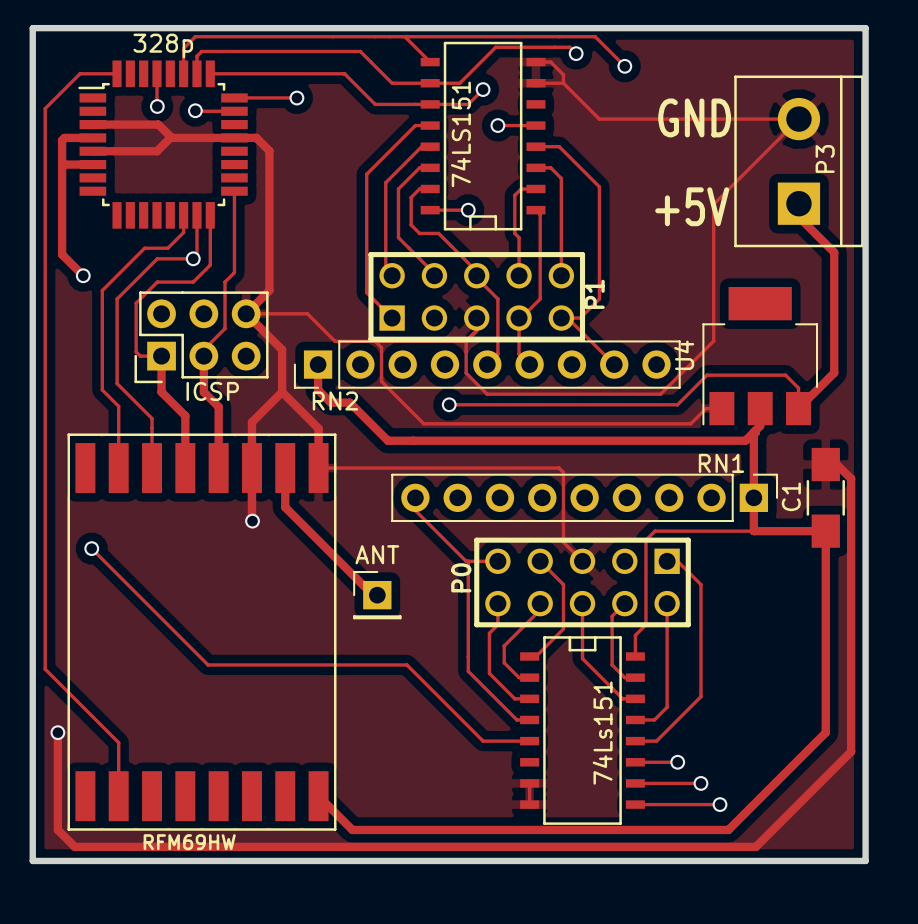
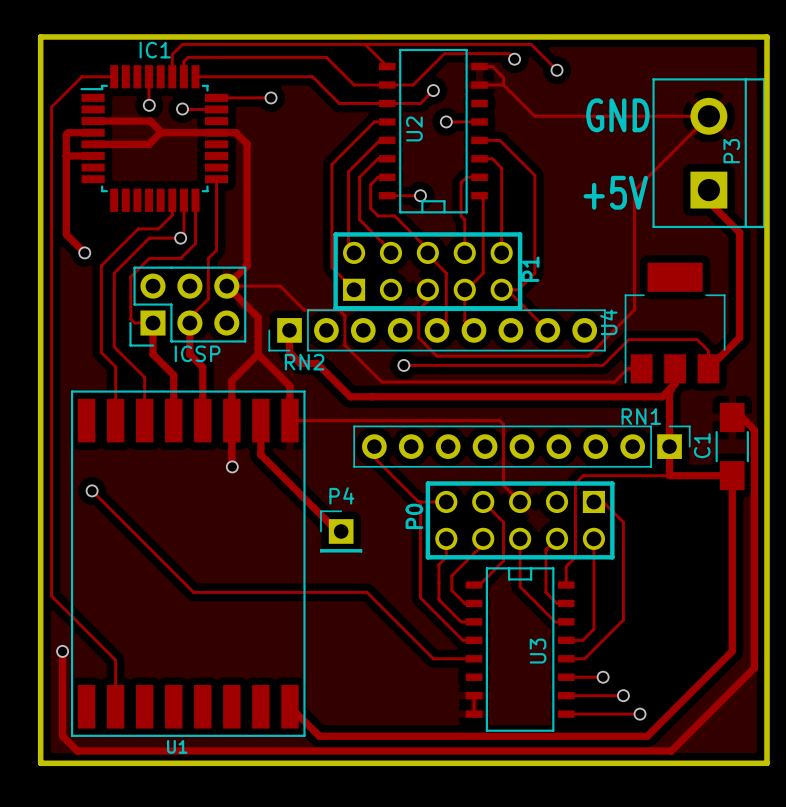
328p name: 328p (163, 45) -> IC1 (155, 50)
74LS151 name: 74LS151 (460, 134) -> U2 (414, 128)
ANT name: ANT (377, 554) -> P4 (341, 495)
74Ls151 name: 74Ls151 (602, 733) -> U3 (538, 651)
RFM69HW name: RFM69HW (189, 842) -> U1 (177, 746)

